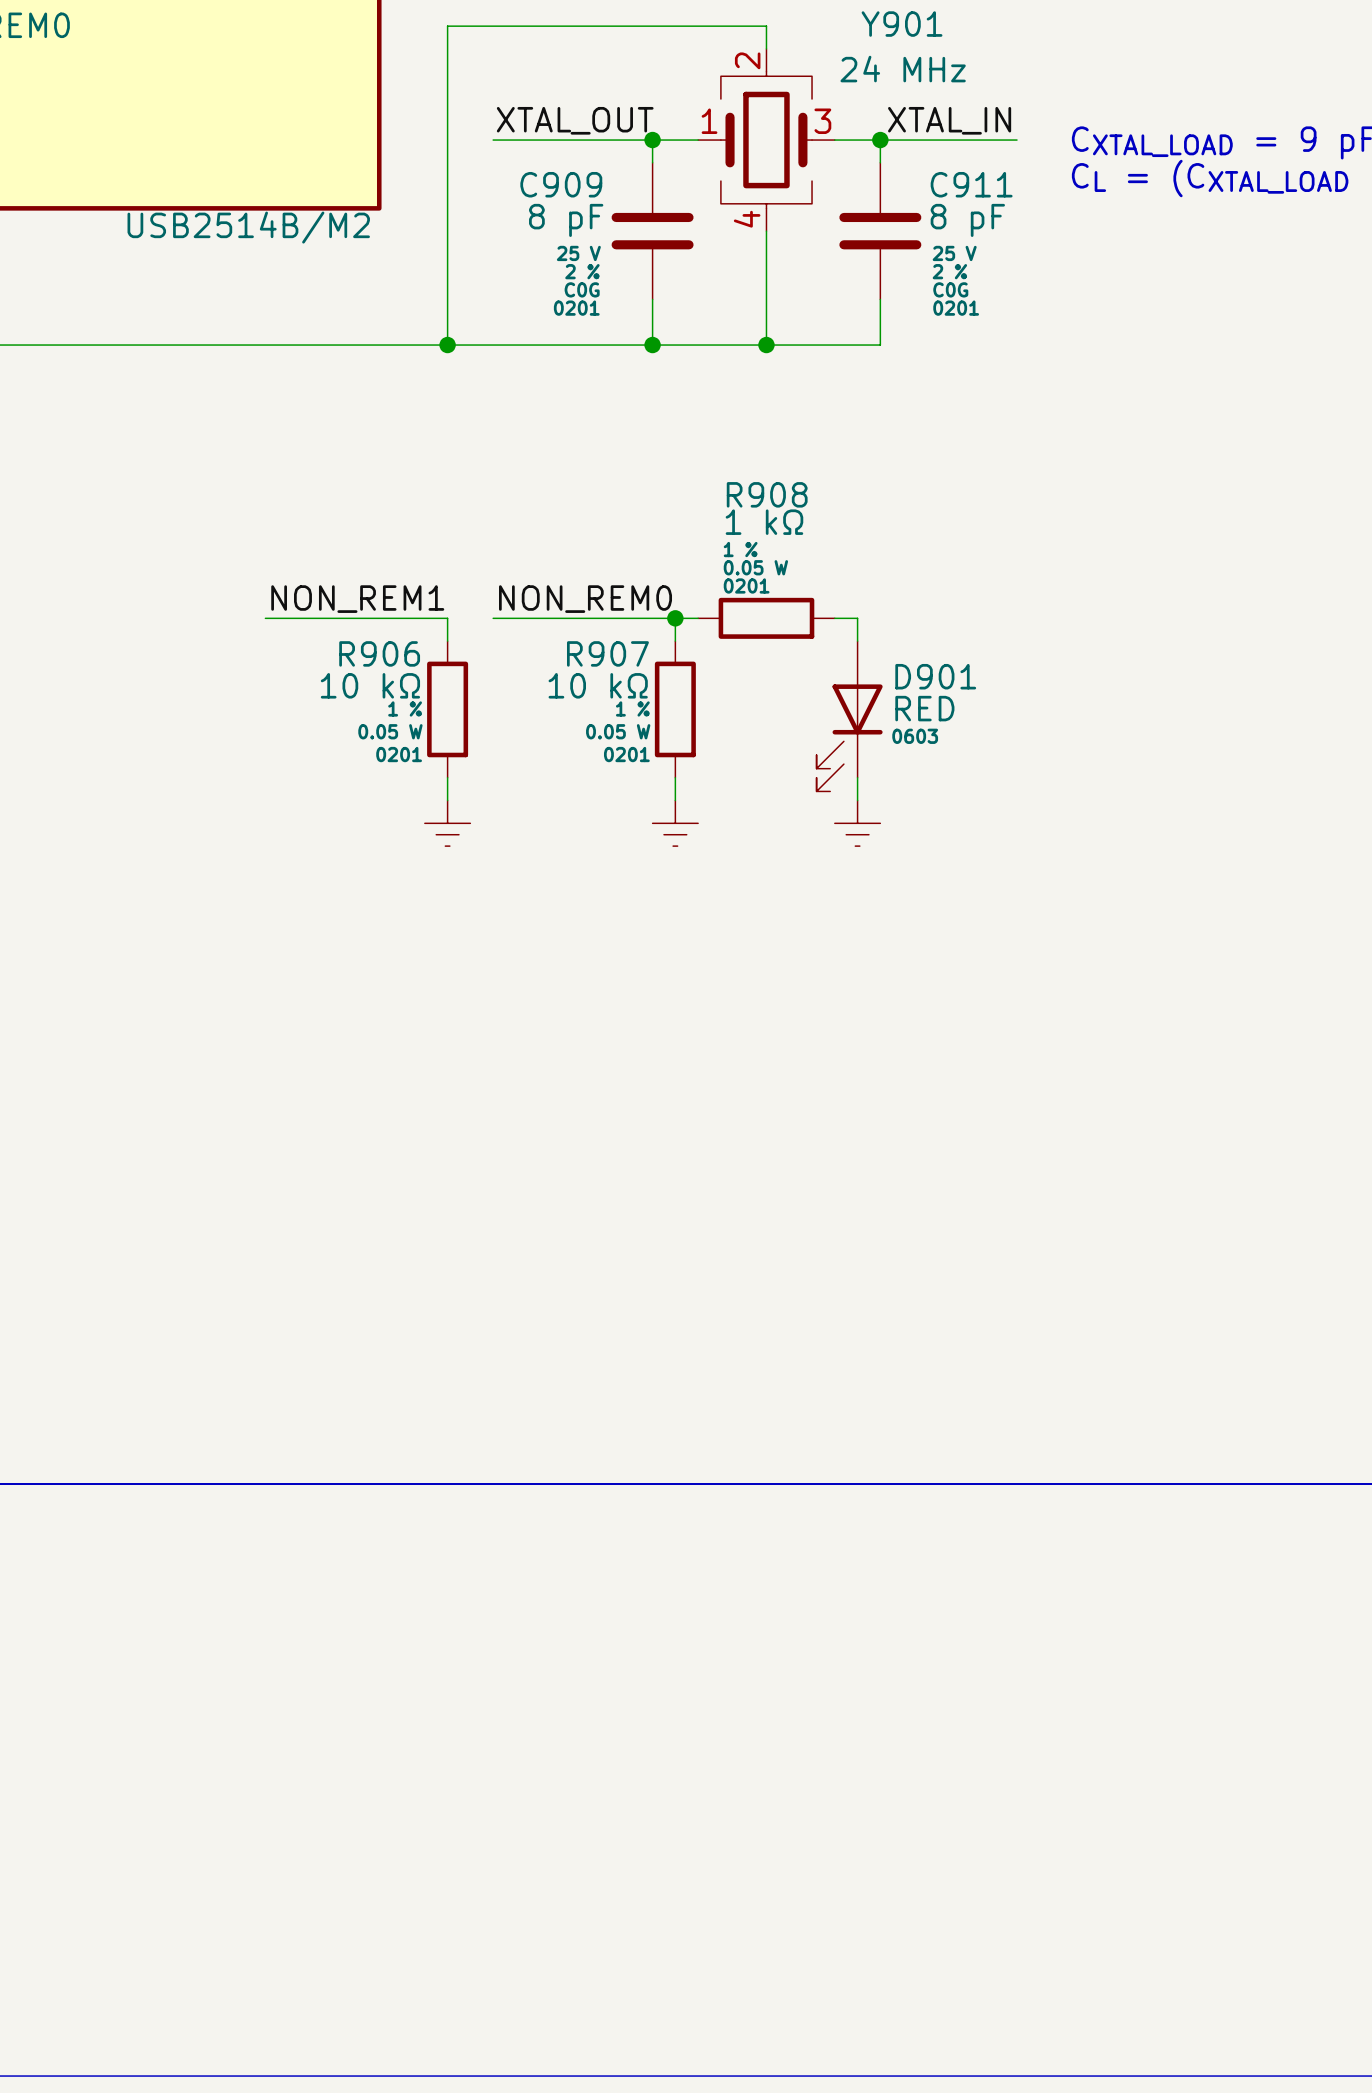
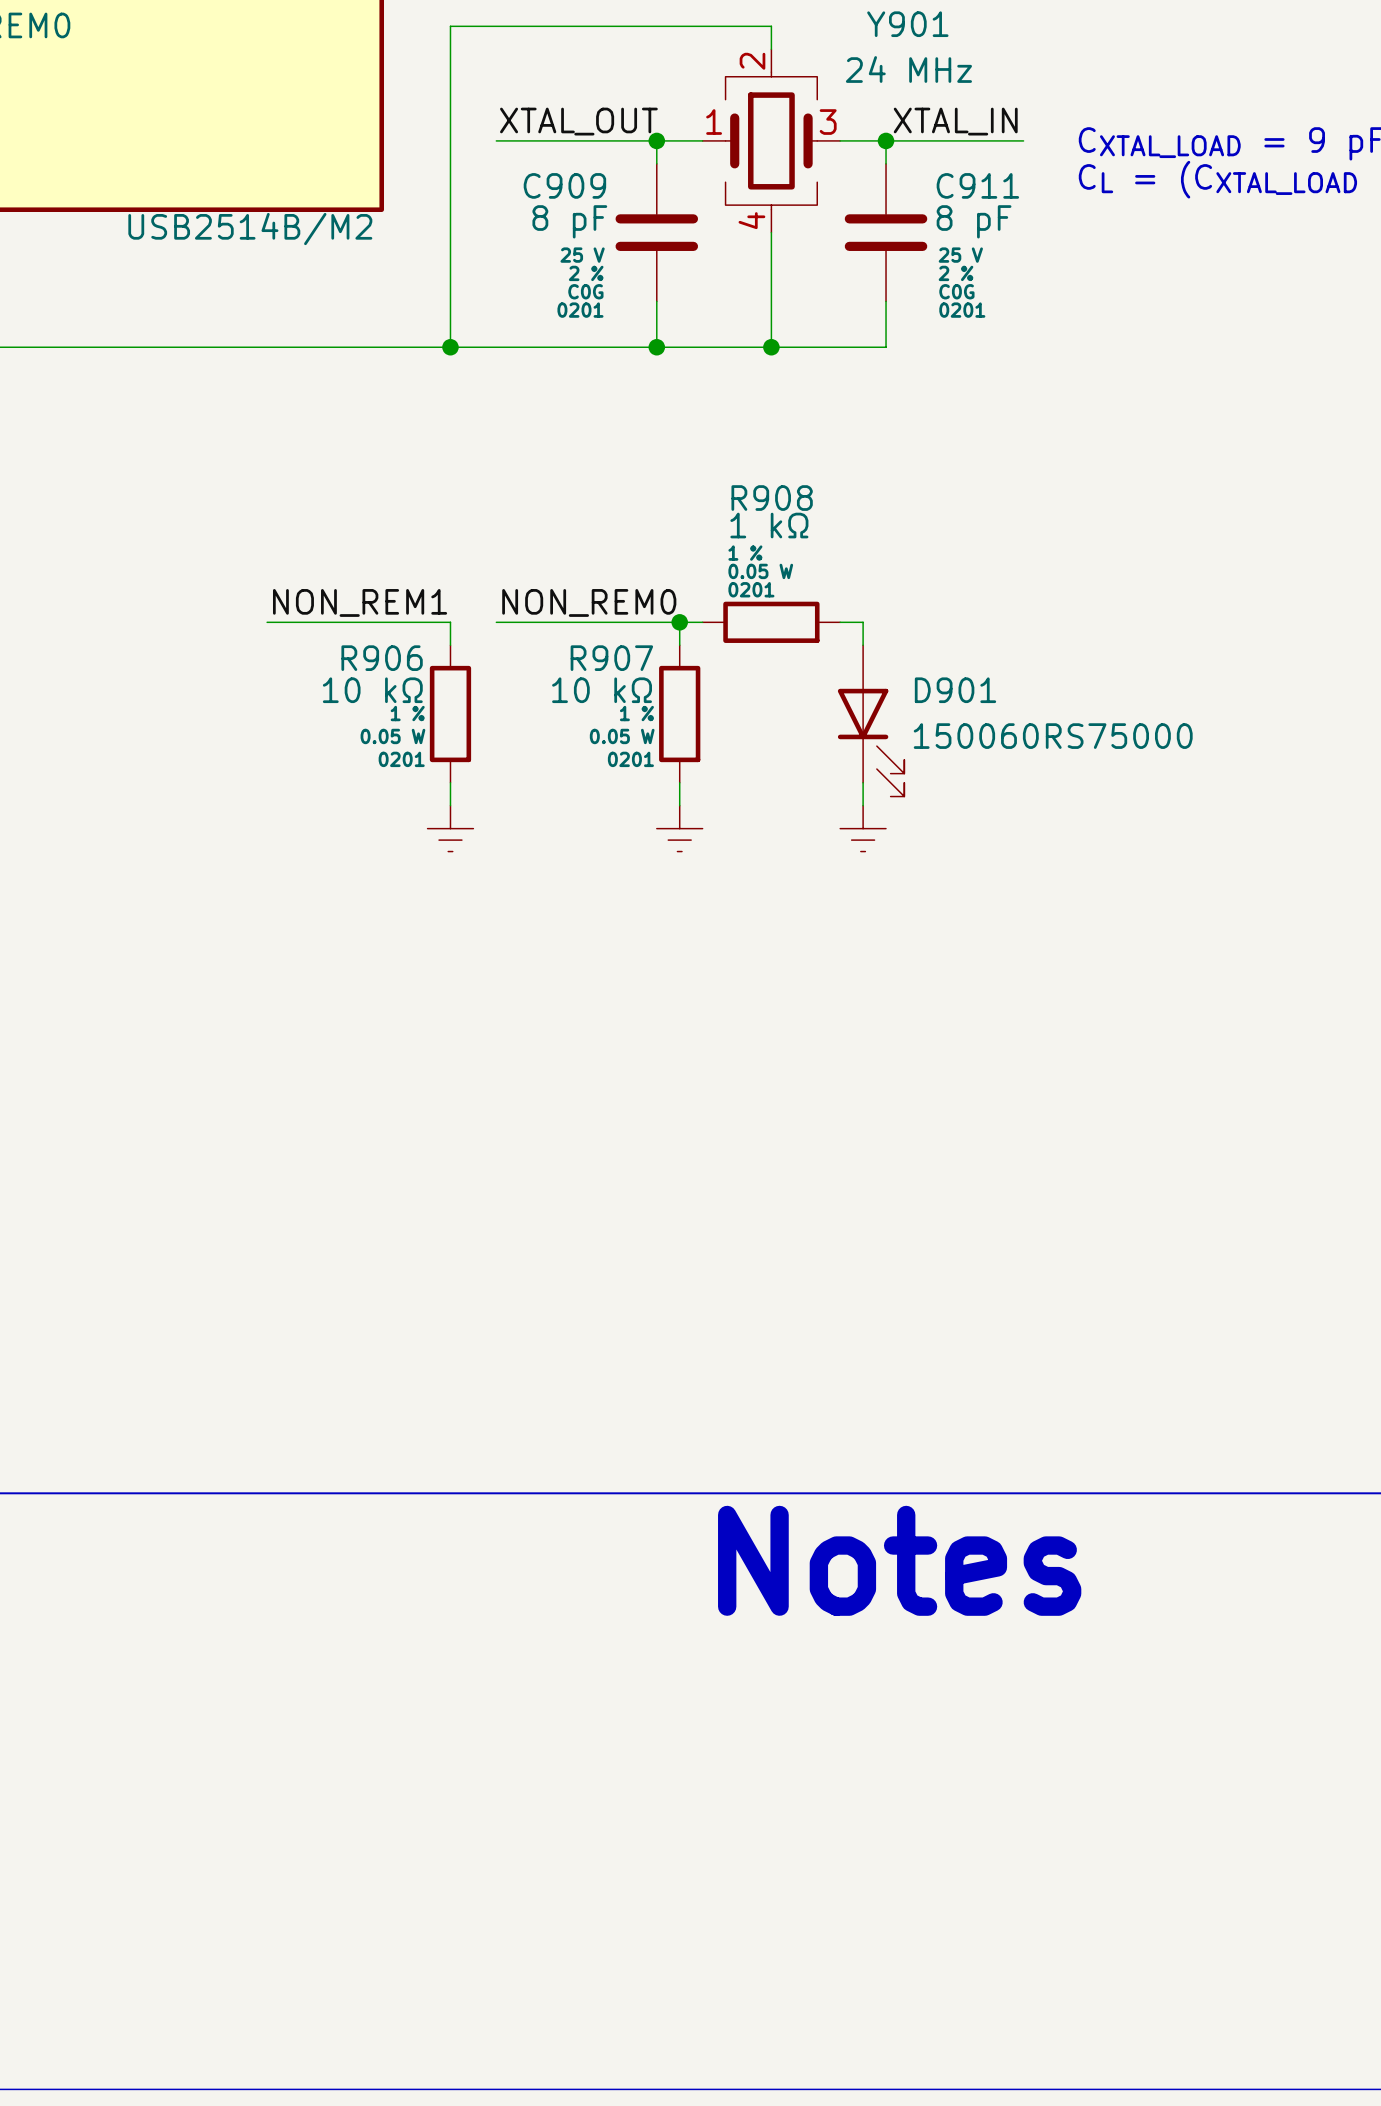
D901 value: RED (924, 708) -> 150060RS75000 (1053, 736)
D901 text: 0603 (915, 736) -> none
D901 flip: as is (849, 737) -> left-right (871, 742)
text: none -> Notes (899, 1560)

